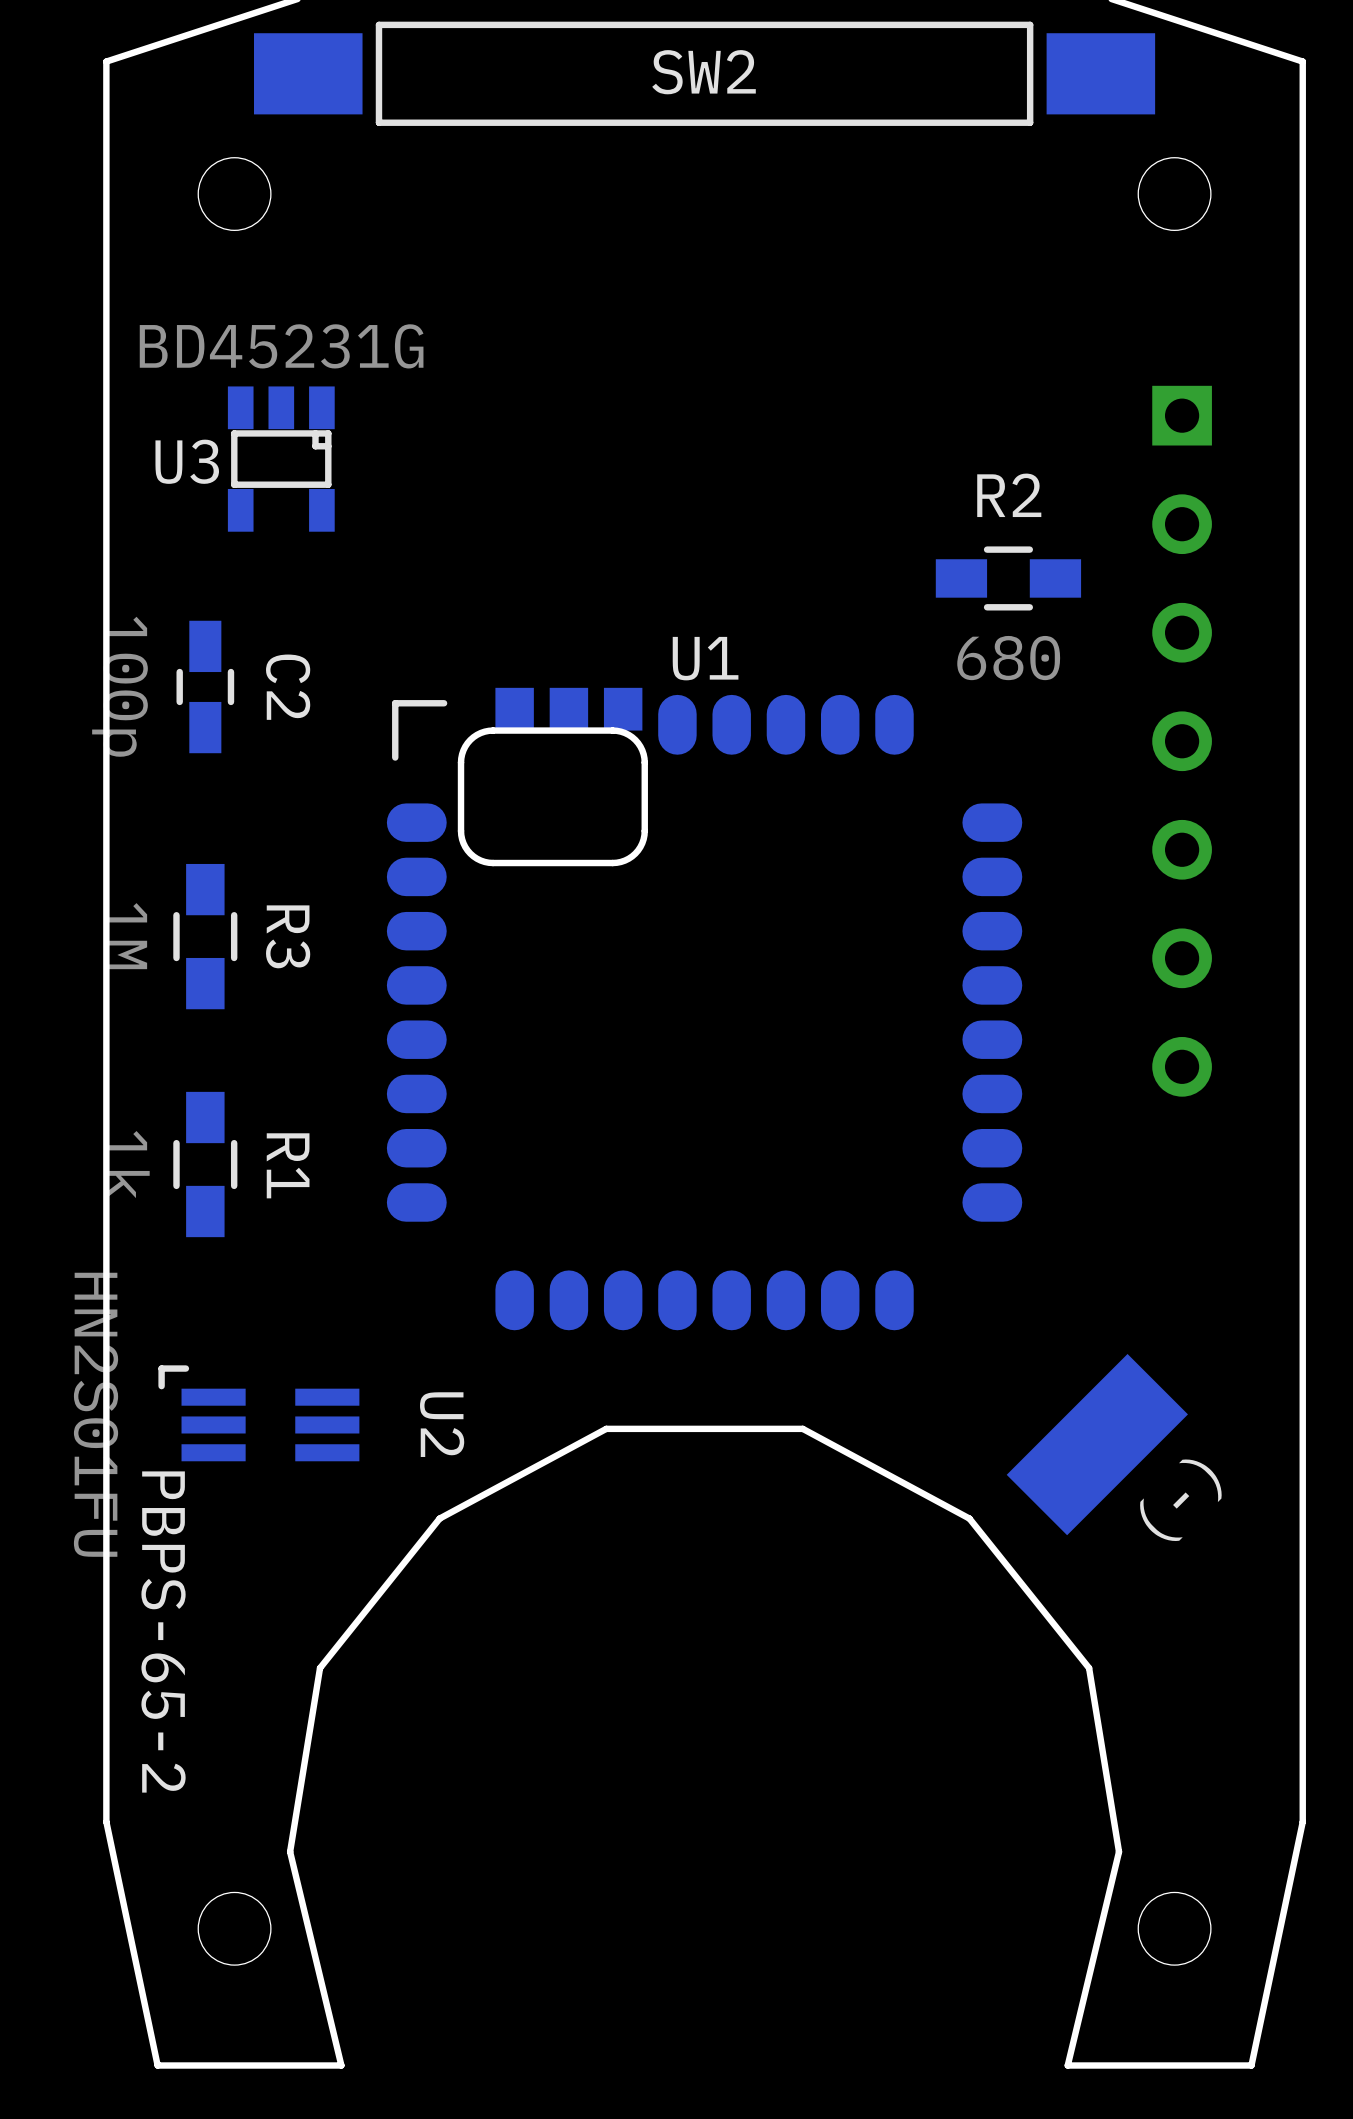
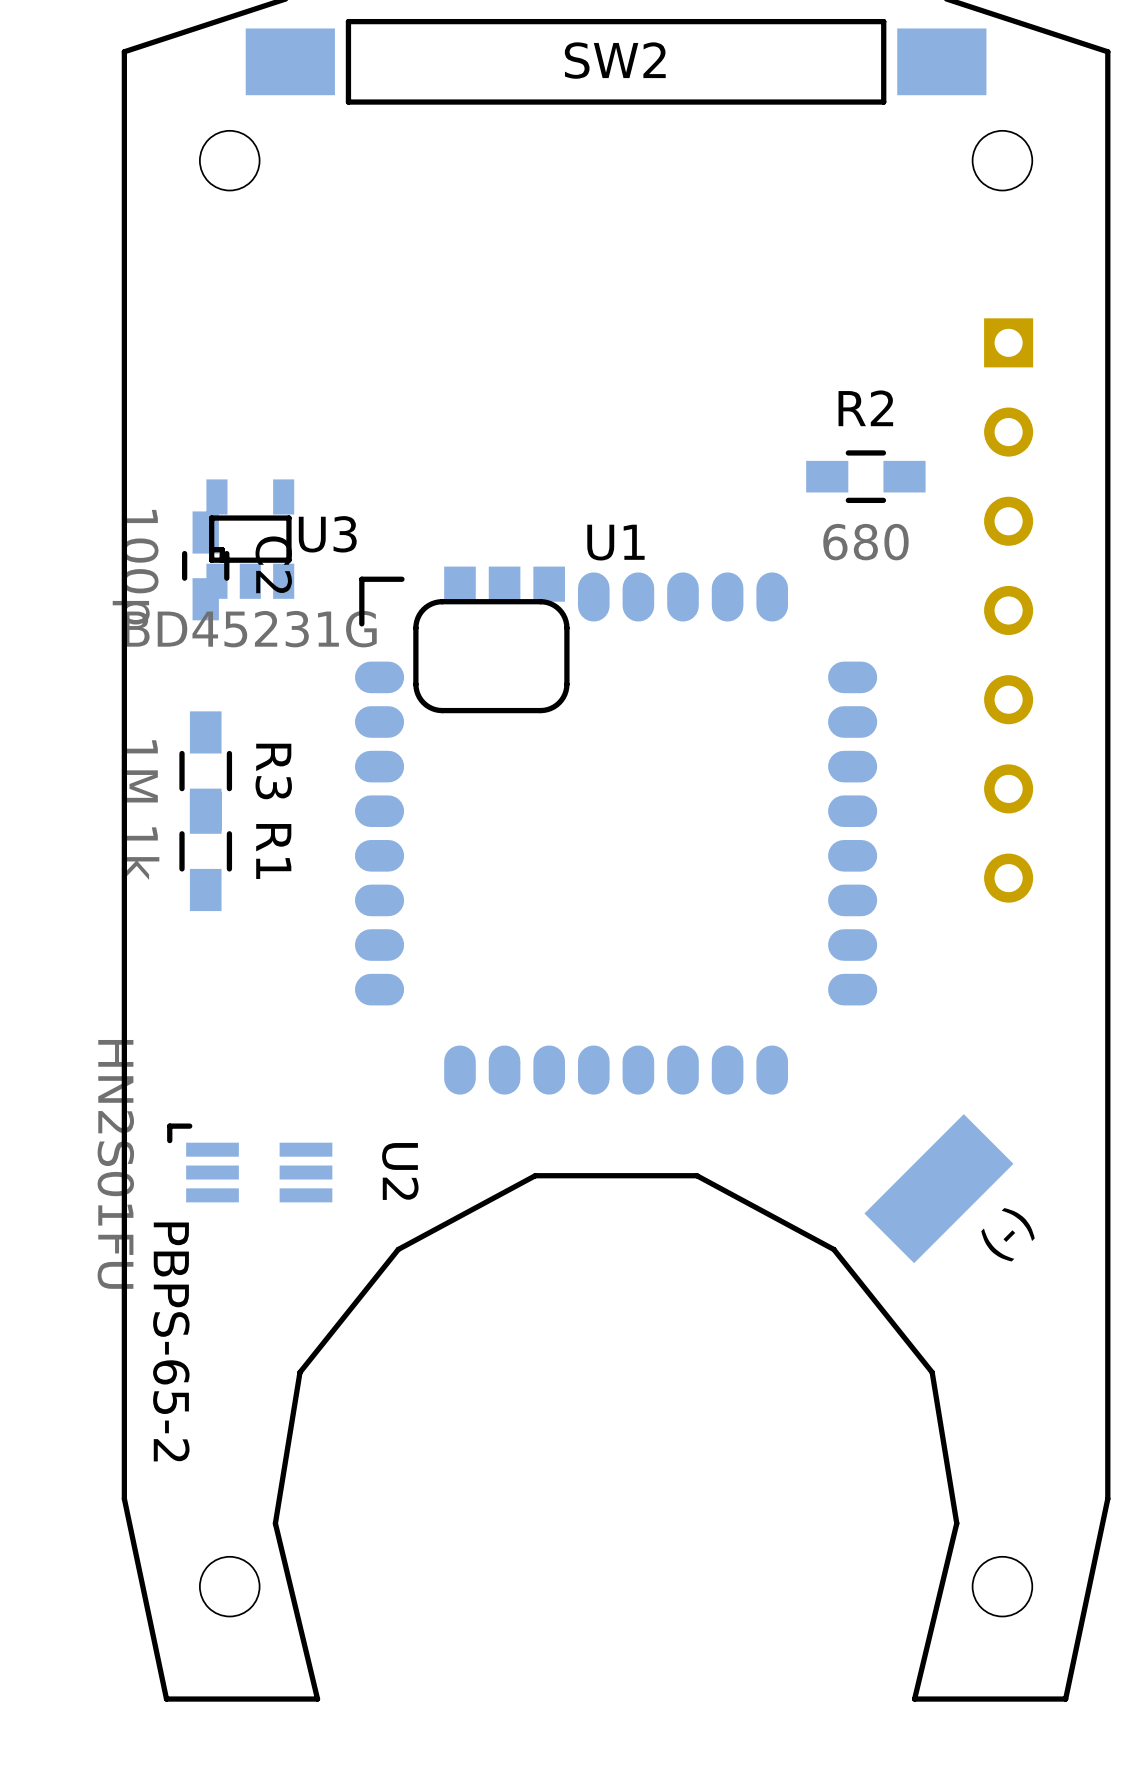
U3 rotation: 0° (281, 459) -> 180° (250, 539)
U3 position: (281, 459) -> (250, 539)
R1 position: (205, 1164) -> (205, 851)

